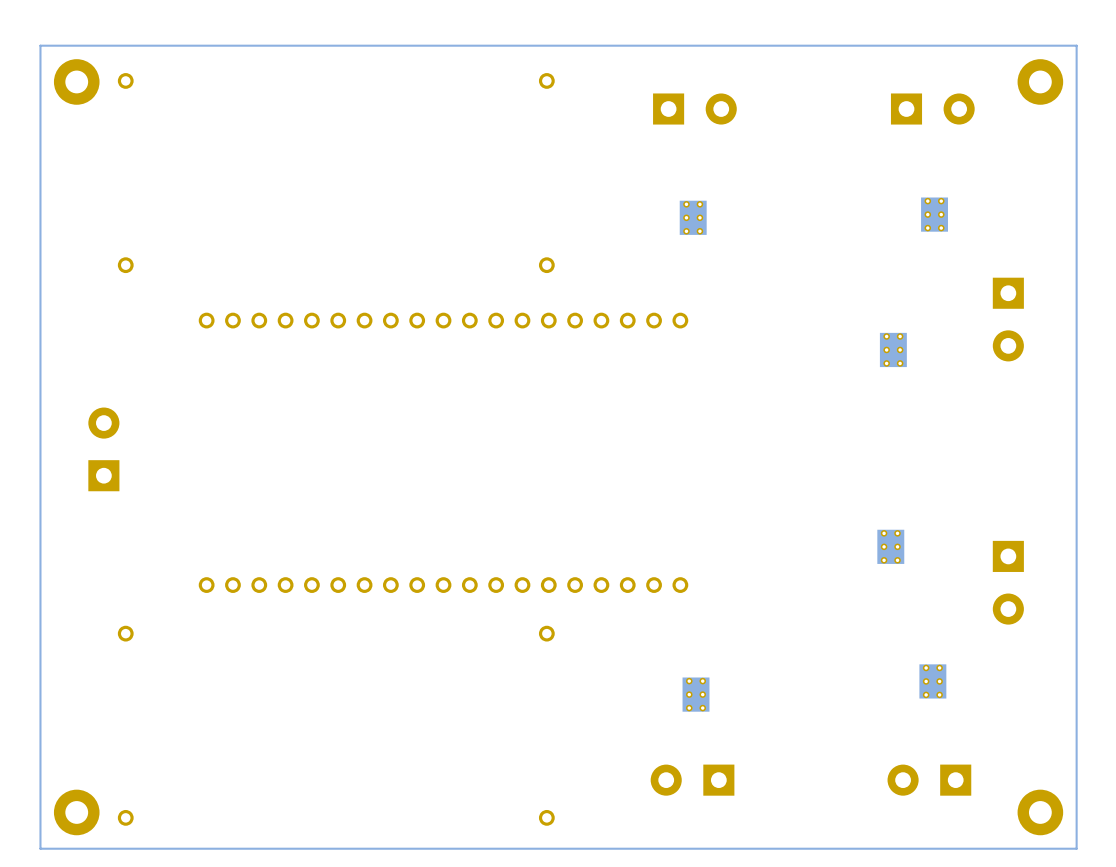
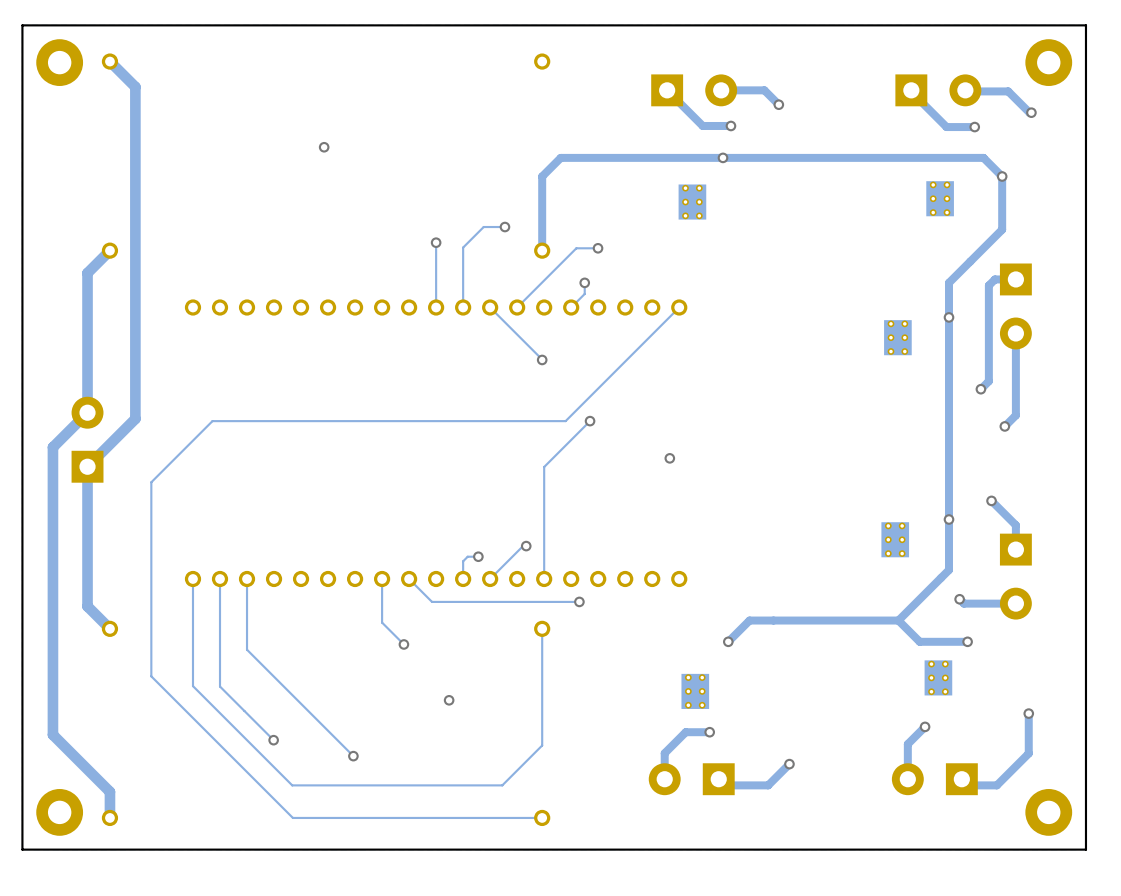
track: (1076, 45) (40, 45) (40, 848) (1076, 848) (1076, 45) -> none
board edge: none -> (1085, 25) (22, 25) (22, 849) (1085, 849) (1085, 25)
track: none -> (109, 61) (135, 86) (135, 418) (87, 466) (87, 606) (109, 628)
track: none -> (667, 90) (702, 125) (730, 125)
track: none -> (721, 90) (764, 90) (778, 104)
track: none -> (910, 91) (946, 127) (974, 127)
track: none -> (964, 91) (1008, 91) (1031, 112)
via: none -> (778, 104)
via: none -> (1031, 112)
via: none -> (730, 125)
via: none -> (974, 127)
via: none -> (324, 147)
via: none -> (722, 157)
via: none -> (1002, 176)
track: none -> (504, 227) (483, 227) (463, 247) (463, 307)
via: none -> (504, 227)
track: none -> (436, 242) (436, 307)
via: none -> (436, 242)
track: none -> (598, 248) (576, 248) (517, 307)
via: none -> (598, 248)
track: none -> (109, 250) (87, 273) (87, 412) (52, 447) (52, 734) (109, 791) (109, 817)
track: none -> (542, 250) (542, 176) (560, 157) (983, 157) (1002, 176) (1002, 229) (948, 282) (948, 570) (898, 620)
track: none -> (1015, 279) (994, 279) (988, 285) (988, 381) (980, 389)
track: none -> (584, 282) (584, 293) (571, 307)
via: none -> (584, 282)
track: none -> (490, 307) (542, 359)
track: none -> (679, 307) (565, 421) (212, 421) (151, 482) (151, 676) (292, 817) (542, 817)
via: none -> (948, 317)
track: none -> (1015, 333) (1015, 415) (1004, 426)
via: none -> (542, 359)
via: none -> (980, 389)
track: none -> (590, 421) (544, 466) (544, 578)
via: none -> (590, 421)
via: none -> (1004, 426)
via: none -> (669, 458)
track: none -> (991, 500) (1015, 525) (1015, 549)
via: none -> (991, 500)
via: none -> (948, 519)
track: none -> (526, 546) (523, 546) (490, 578)
via: none -> (526, 546)
track: none -> (478, 556) (467, 556) (463, 561) (463, 578)
via: none -> (478, 556)
track: none -> (192, 578) (192, 686) (292, 785) (502, 785) (542, 745) (542, 628)
track: none -> (220, 578) (220, 686) (273, 740)
track: none -> (247, 578) (247, 649) (353, 756)
track: none -> (382, 578) (382, 622) (403, 644)
track: none -> (409, 578) (432, 601) (579, 601)
track: none -> (959, 599) (963, 603) (1015, 603)
via: none -> (959, 599)
via: none -> (579, 601)
track: none -> (898, 620) (749, 620) (728, 641)
track: none -> (898, 620) (919, 641) (967, 641)
via: none -> (728, 641)
via: none -> (967, 641)
via: none -> (403, 644)
via: none -> (449, 700)
track: none -> (1028, 713) (1028, 753) (996, 785) (961, 785)
via: none -> (1028, 713)
track: none -> (925, 726) (907, 744) (907, 785)
via: none -> (925, 726)
track: none -> (709, 732) (685, 732) (664, 753) (664, 785)
via: none -> (709, 732)
via: none -> (273, 740)
via: none -> (353, 756)
track: none -> (789, 764) (768, 785) (718, 785)
via: none -> (789, 764)

